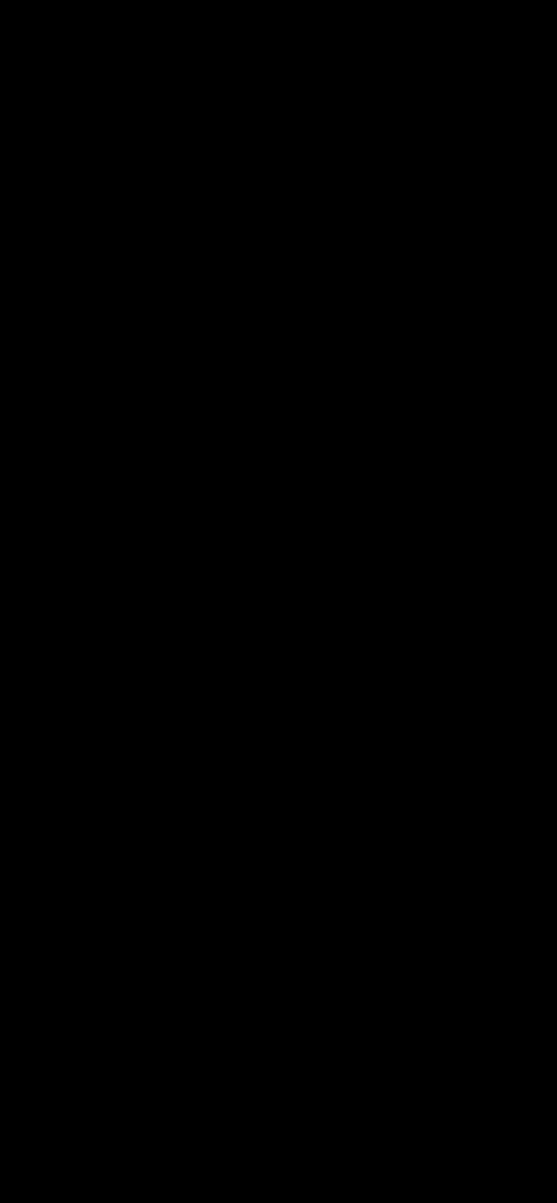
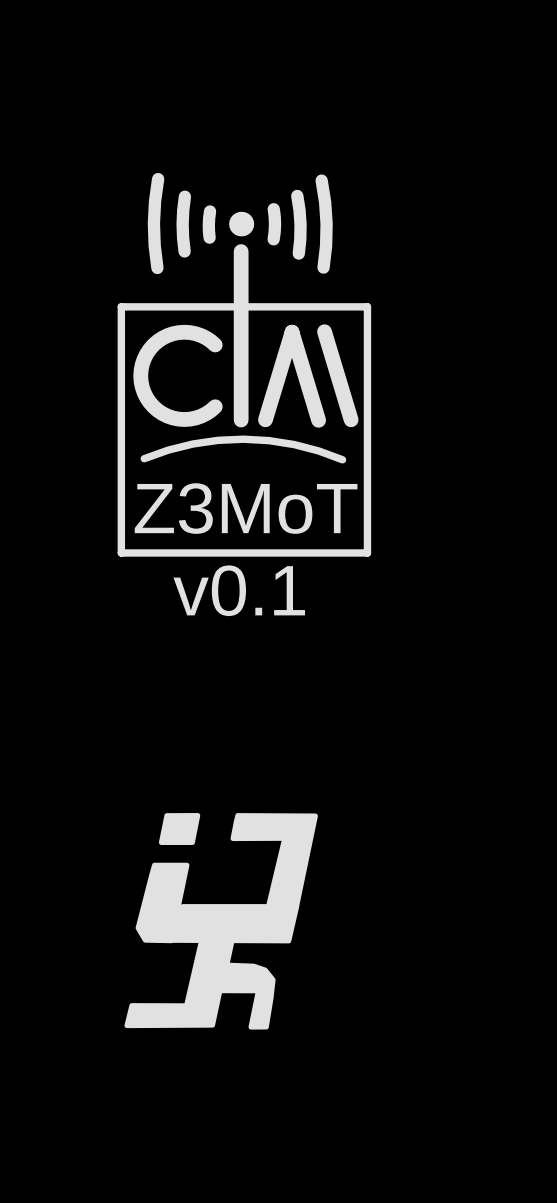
line: none -> (158, 179) (153, 223) (157, 267)
line: none -> (321, 180) (326, 224) (323, 267)
line: none -> (297, 195) (300, 224) (298, 253)
line: none -> (184, 196) (182, 224) (184, 251)
line: none -> (273, 209) (273, 239)
line: none -> (210, 211) (209, 237)
line: none -> (241, 251) (241, 420)
line: none -> (121, 306) (367, 306) (367, 552) (121, 552) (121, 306)
line: none -> (324, 331) (351, 419)
line: none -> (215, 345) (201, 335) (190, 332) (167, 335) (157, 341) (146, 354) (140, 375) (146, 397) (157, 410) (167, 416) (190, 419) (201, 416) (215, 406)
line: none -> (265, 419) (292, 332) (318, 420)
line: none -> (144, 458) (192, 443) (243, 439) (294, 444) (342, 459)
text: none -> Z3MoT (246, 508)
text: none -> v0.1 (239, 590)
drawing: none -> [124, 813, 318, 1030]

